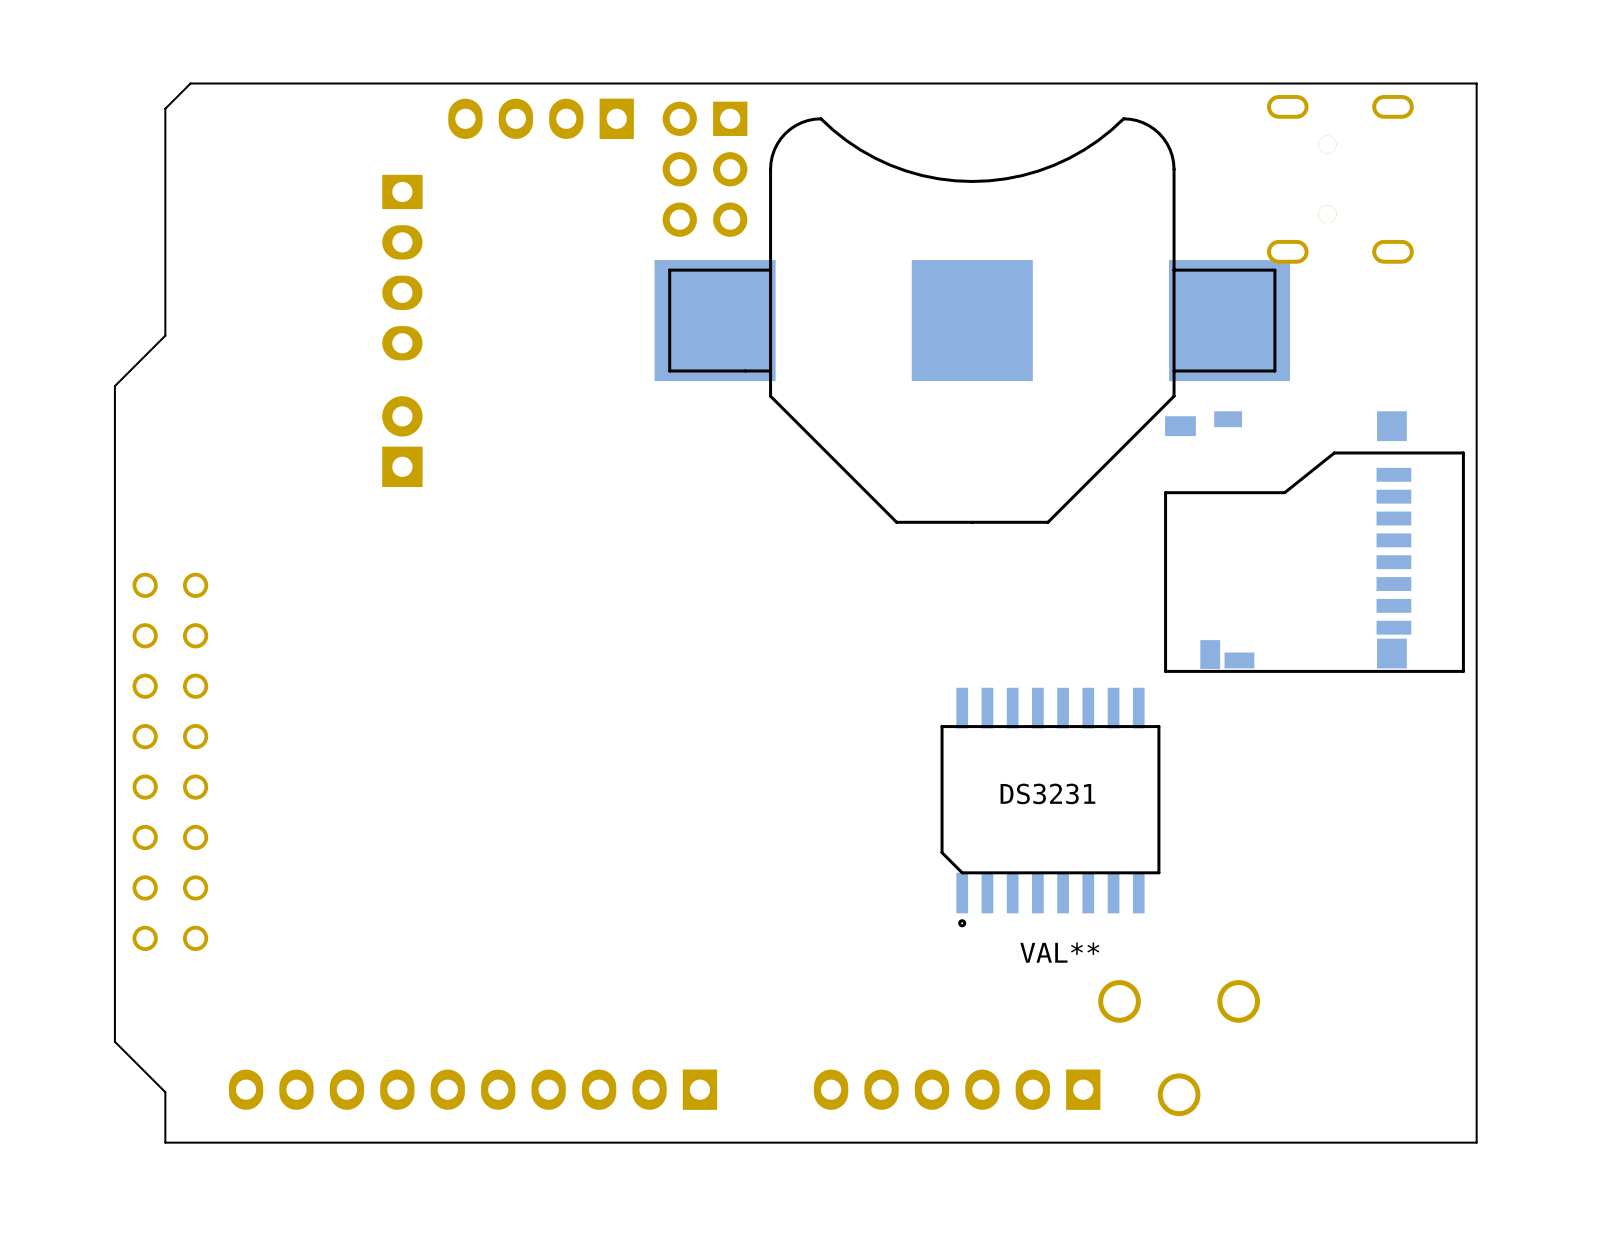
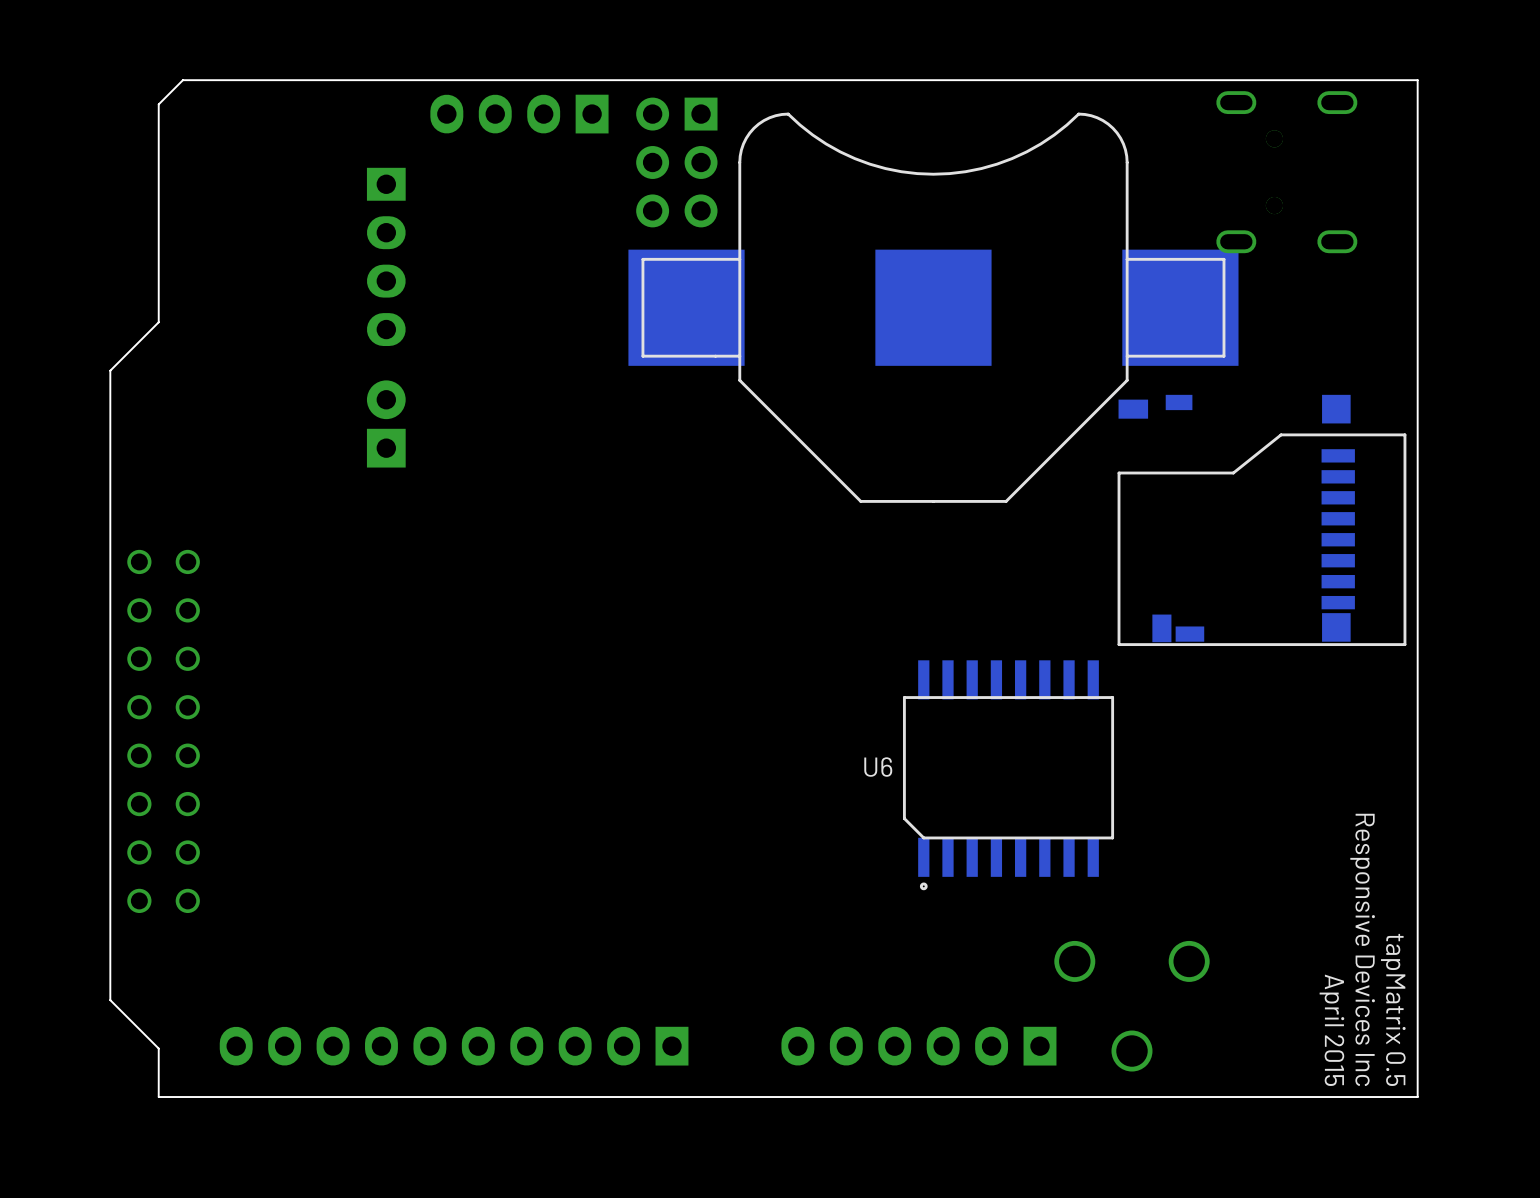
U6 text: DS3231 (1047, 793) -> none
U6 name: none -> U6 (878, 767)
U6 text: VAL** (1059, 952) -> none
text: none -> Responsive Devices Inc (1362, 949)
text: none -> tapMatrix 0.5 (1393, 1009)
text: none -> April 2015 (1331, 1030)

